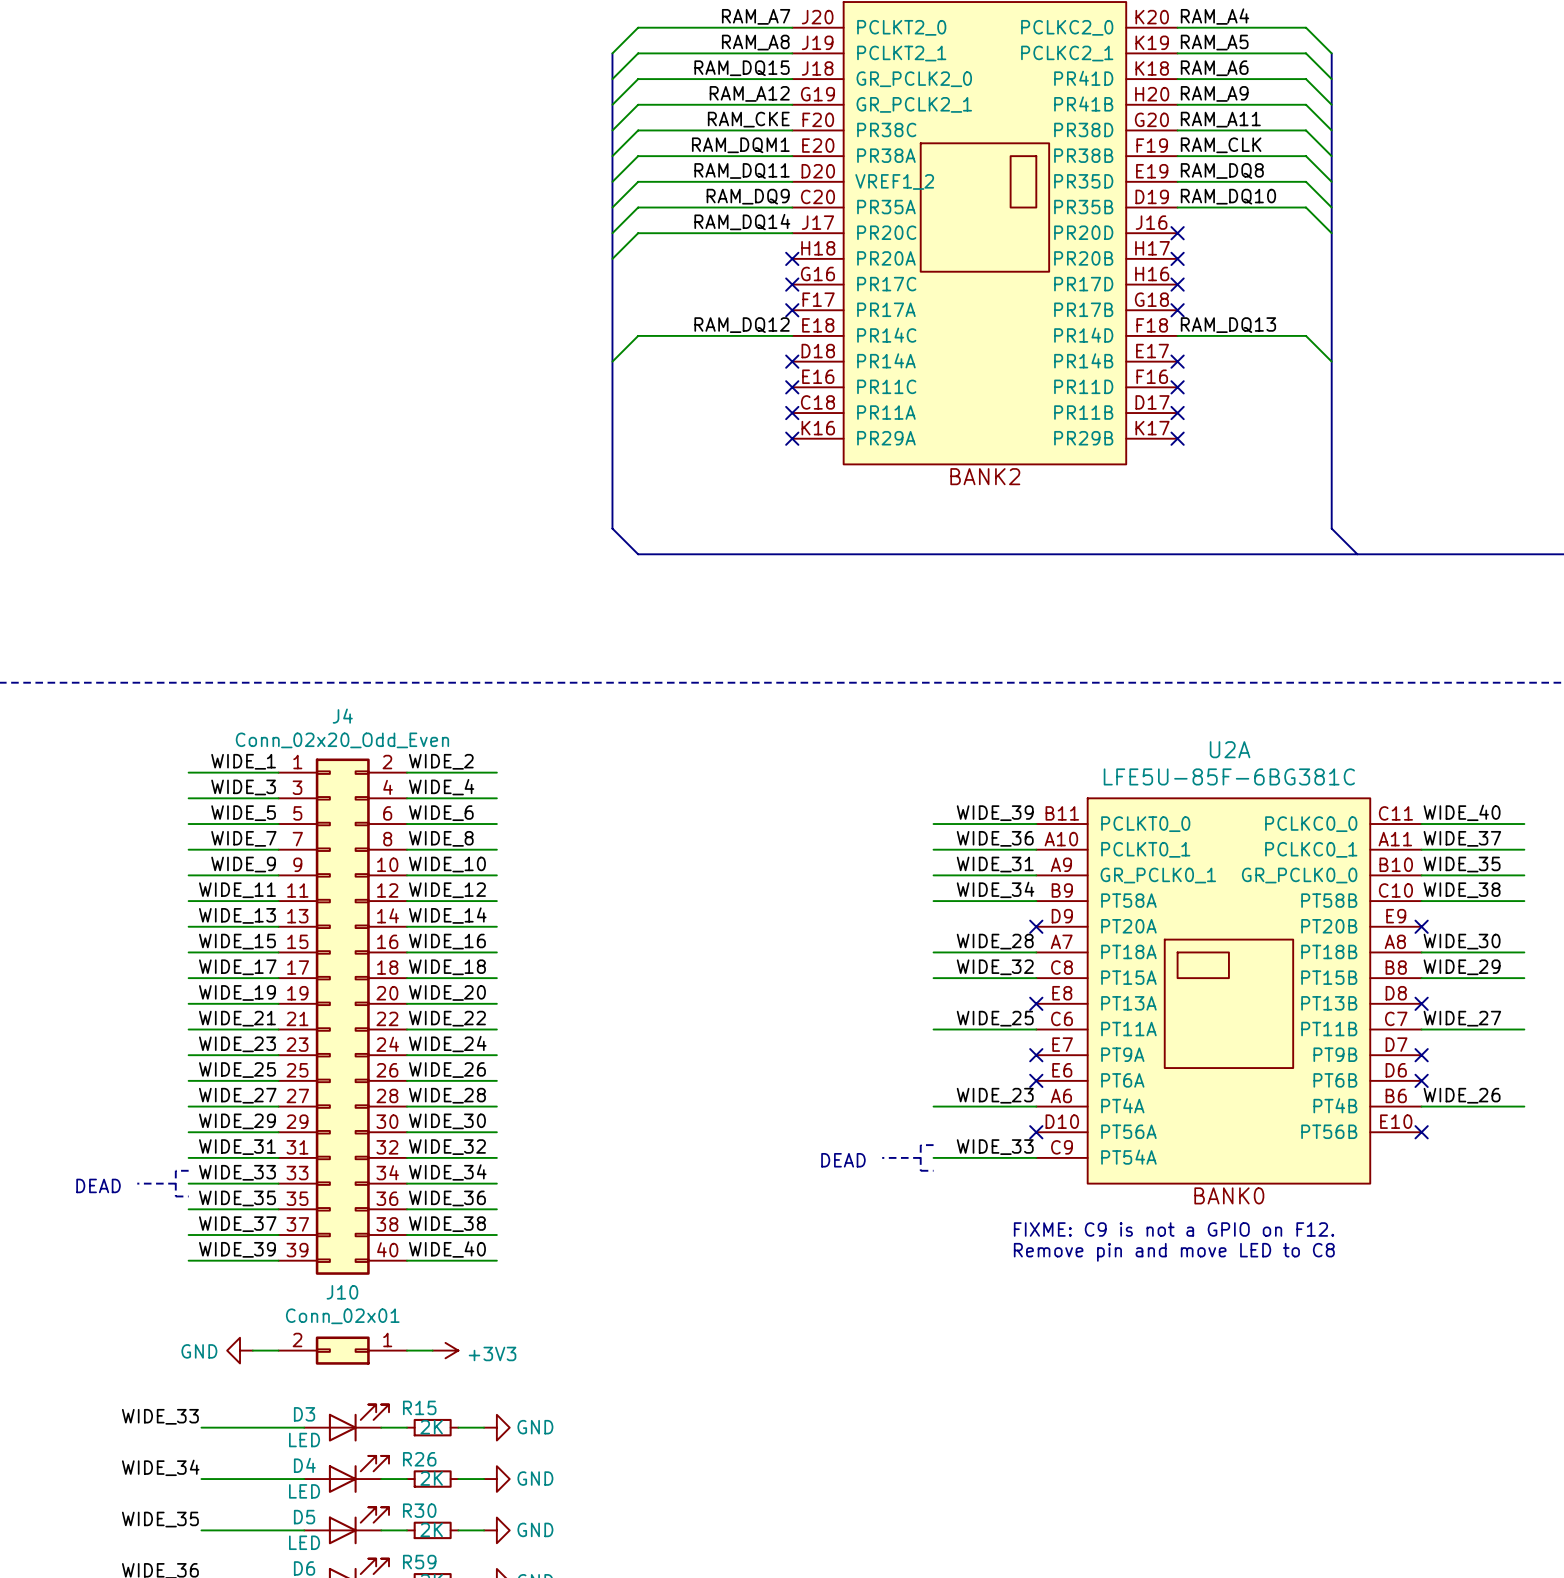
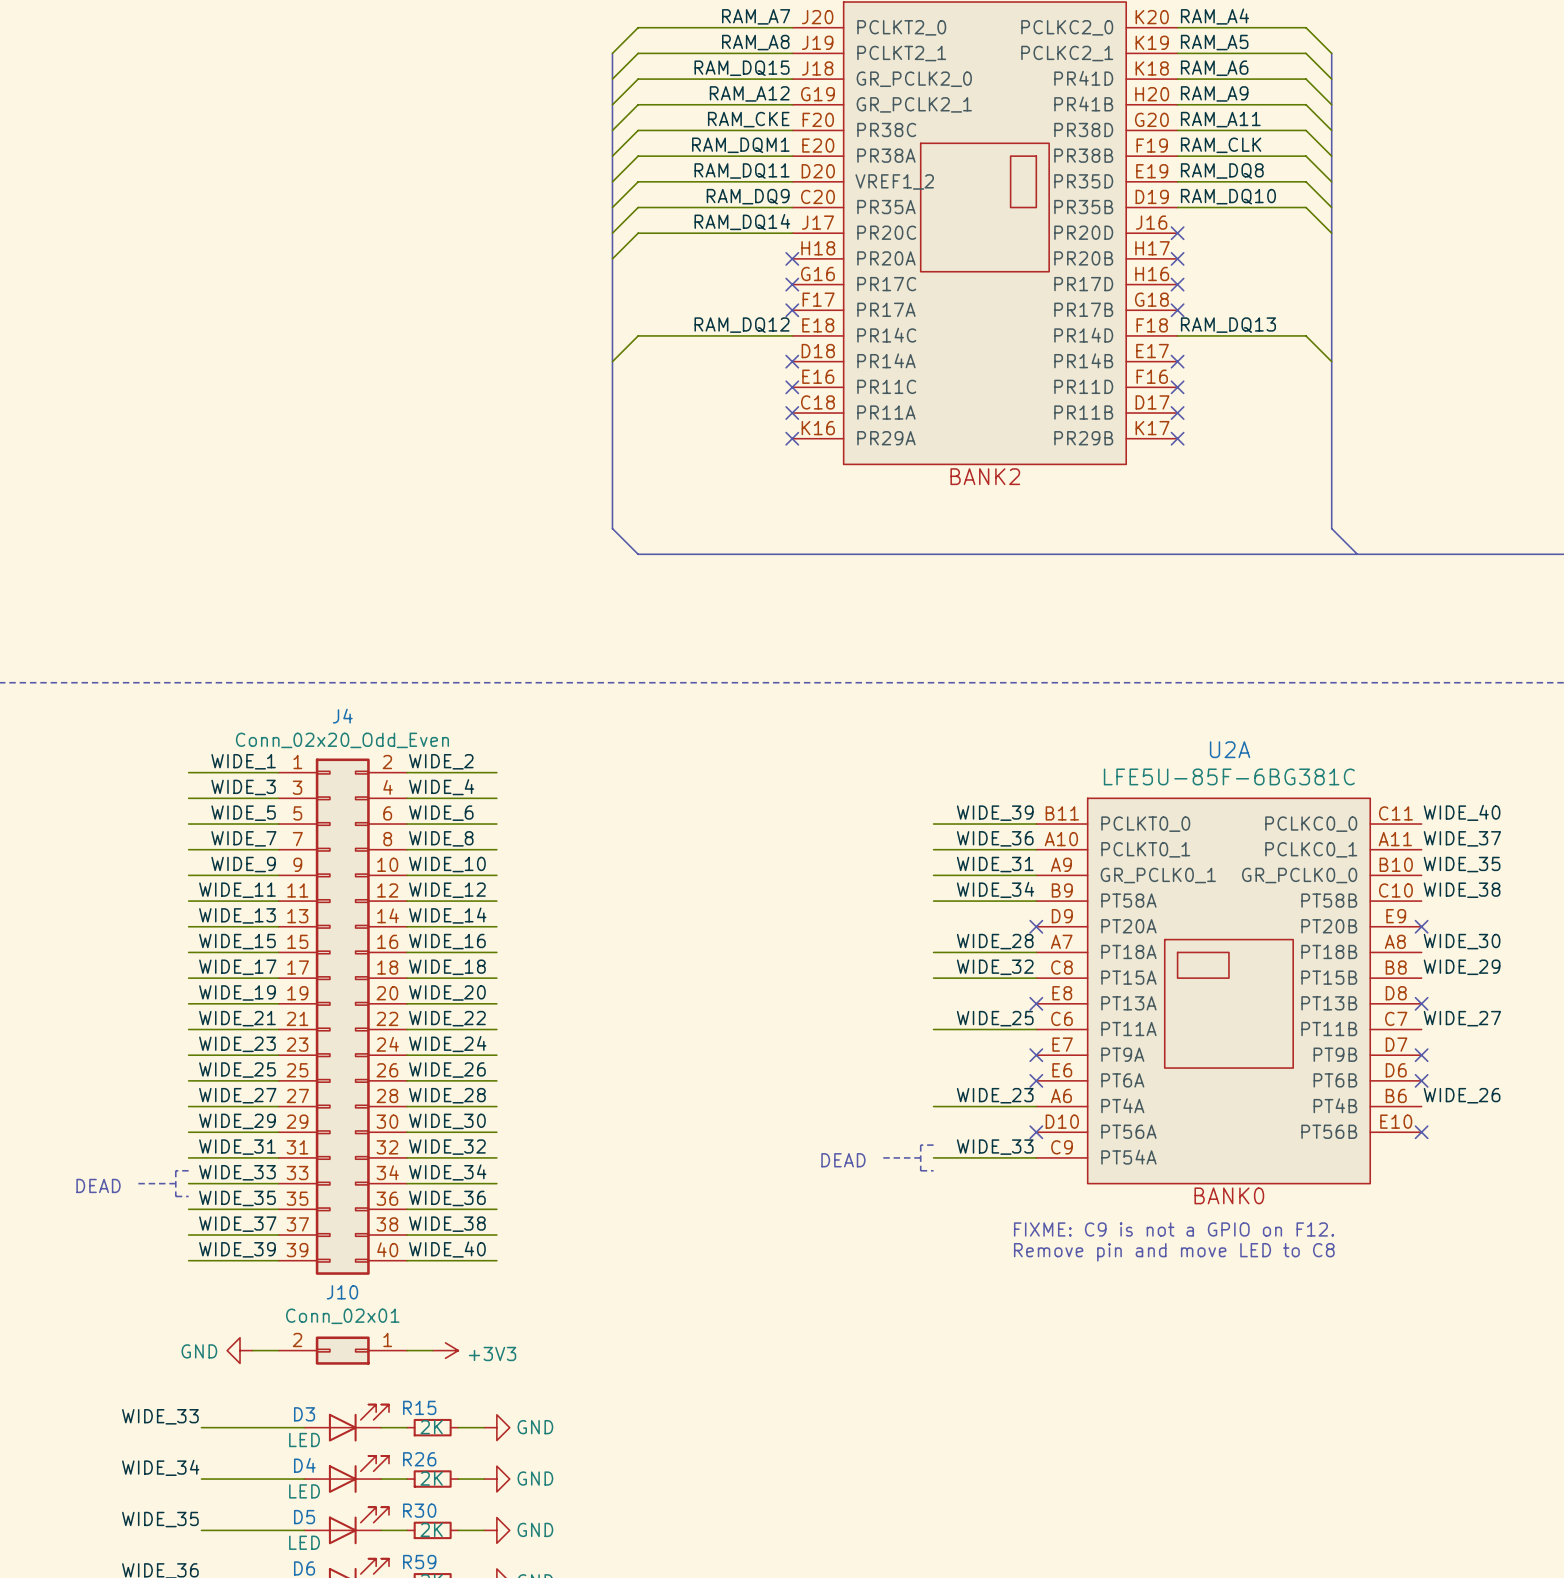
wire: (1421, 824) (1524, 824) -> none
wire: (1421, 849) (1524, 849) -> none
wire: (1421, 875) (1524, 875) -> none
wire: (1421, 901) (1524, 901) -> none
wire: (1421, 952) (1524, 952) -> none
wire: (1421, 978) (1524, 978) -> none
wire: (1421, 1029) (1524, 1029) -> none
wire: (1421, 1106) (1524, 1106) -> none

